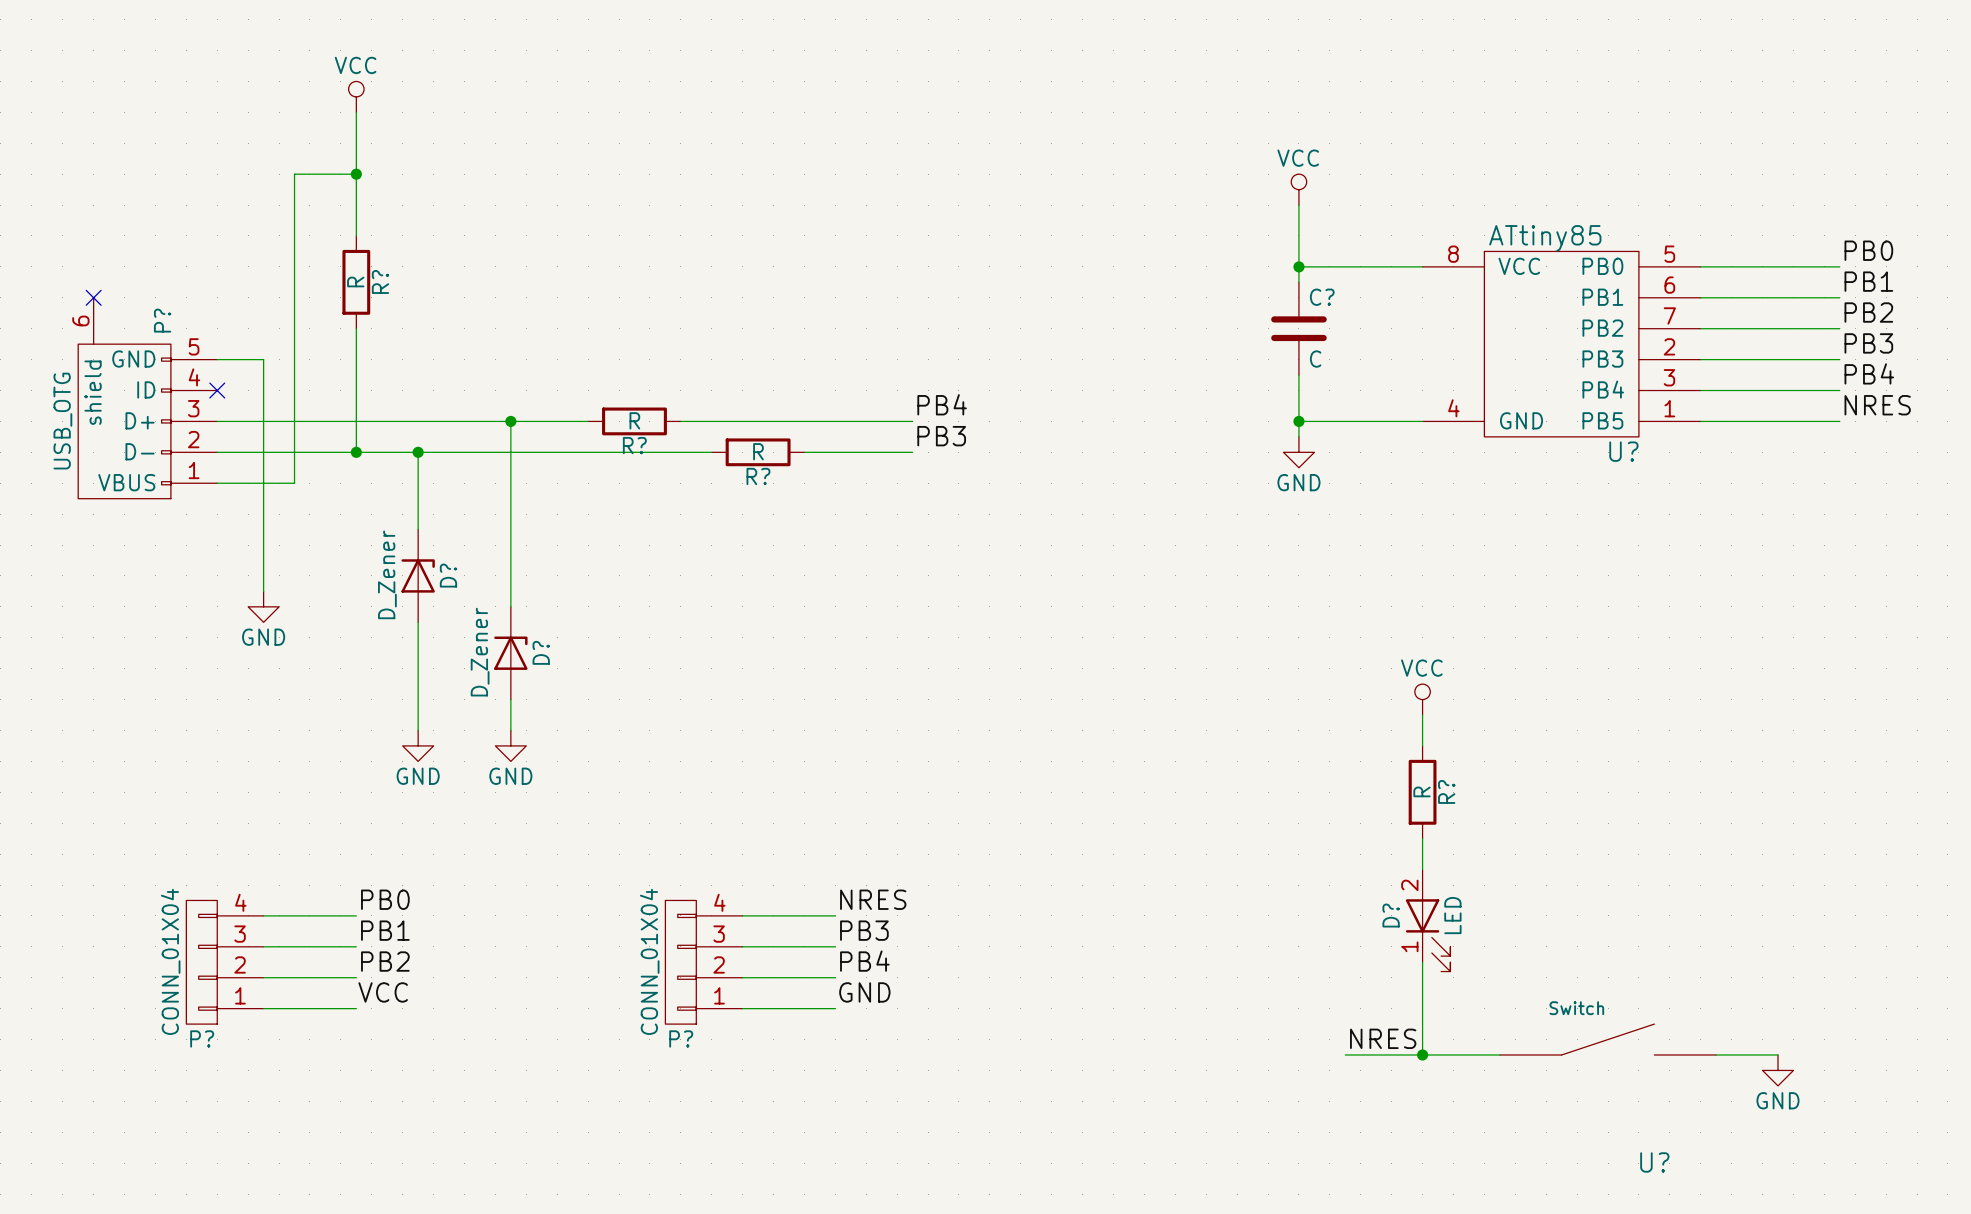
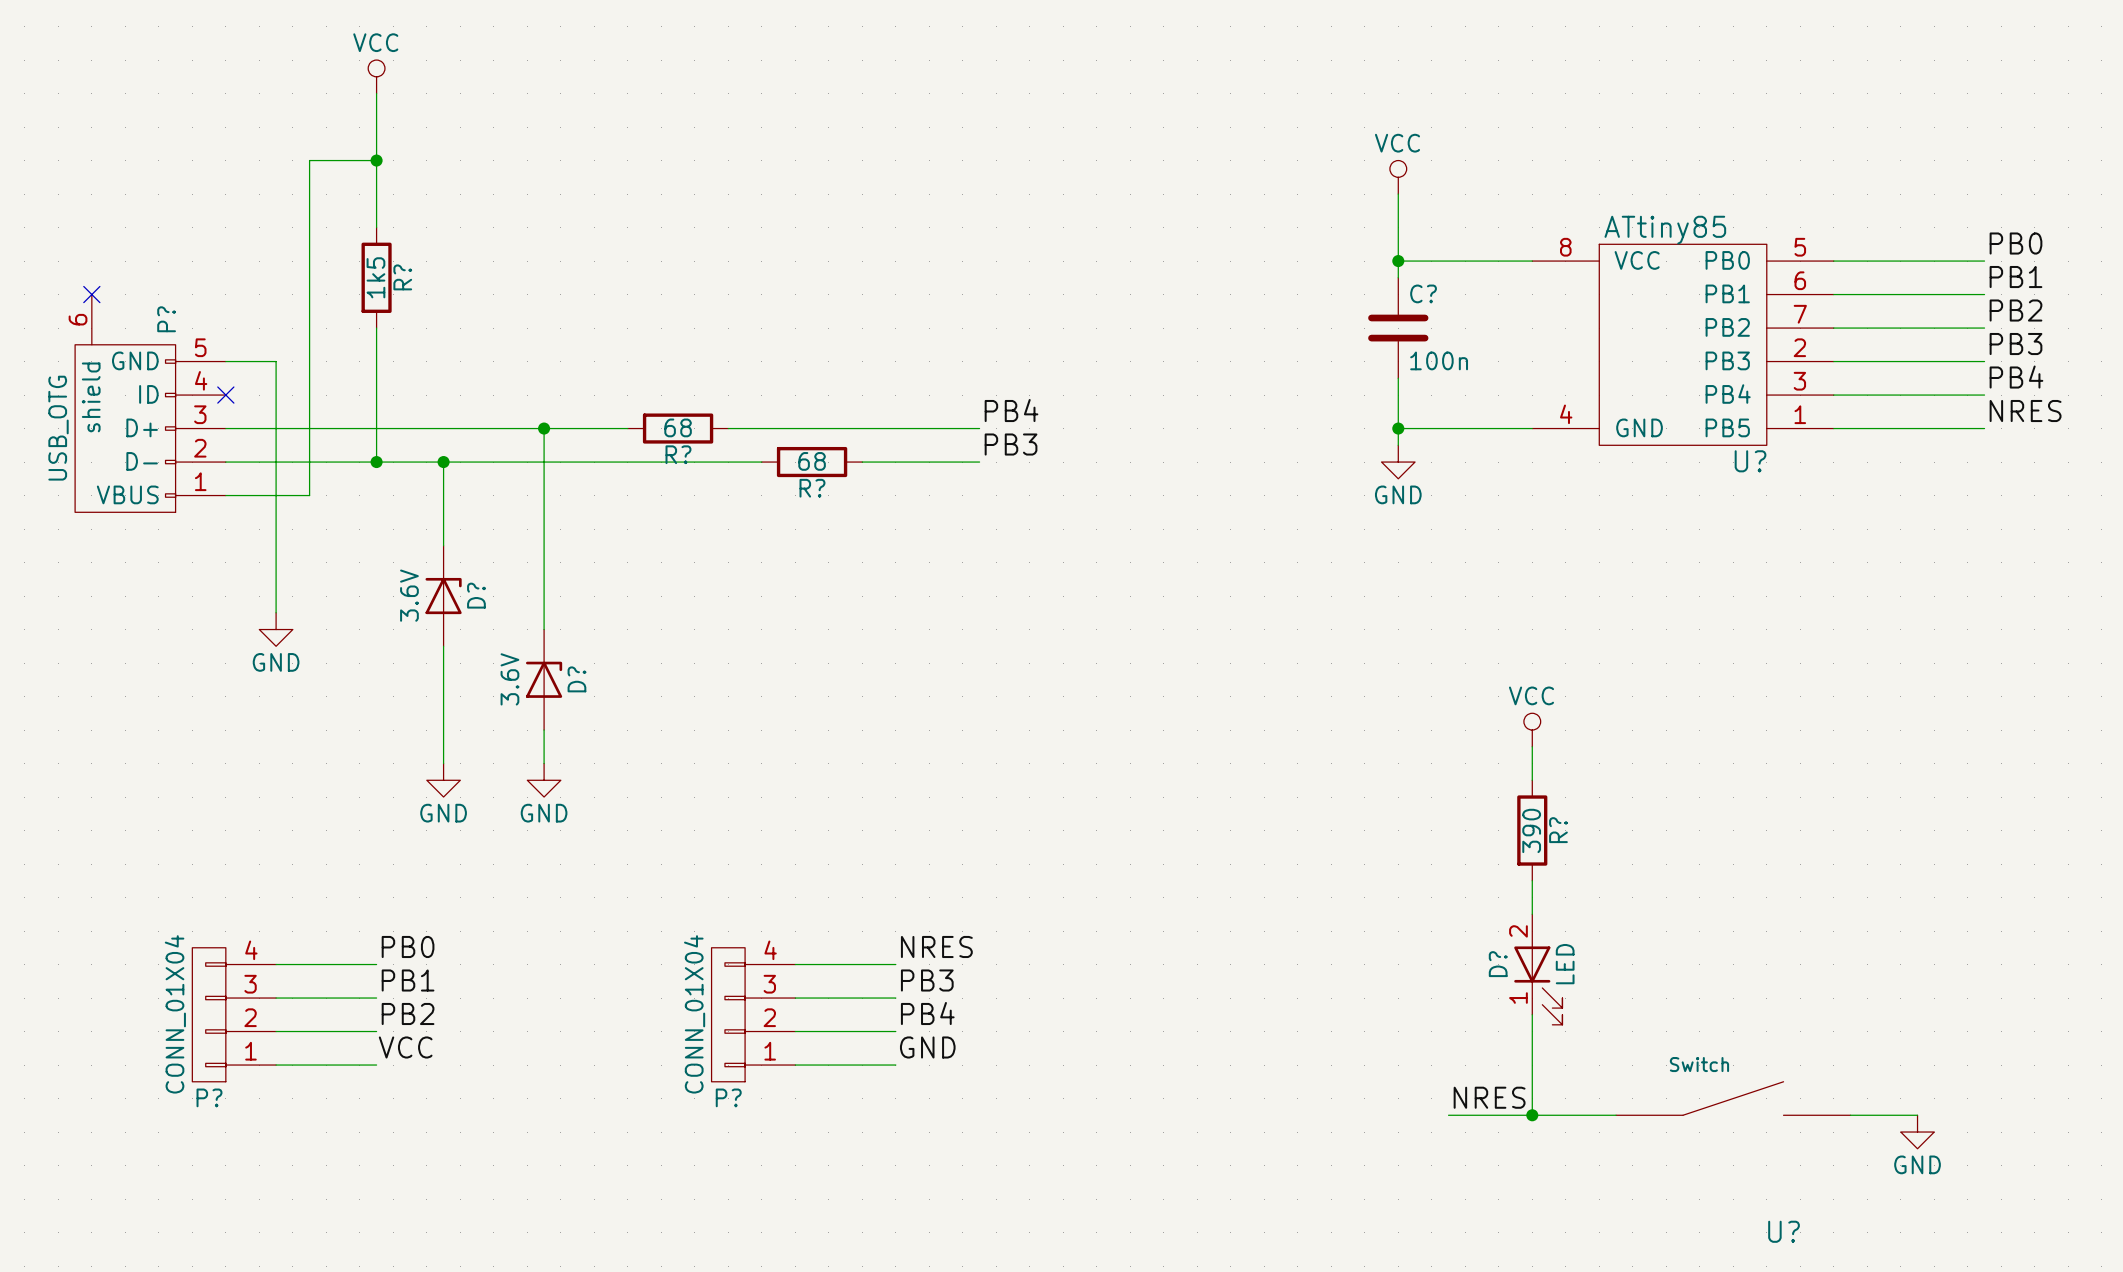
R? value: R (355, 281) -> 1k5 (375, 277)
C? value: C (1315, 359) -> 100n (1439, 360)
R? value: R (634, 420) -> 68 (678, 427)
R? value: R (758, 451) -> 68 (812, 461)
D? value: D_Zener (387, 574) -> 3.6V (409, 595)
D? value: D_Zener (480, 652) -> 3.6V (509, 679)
R? value: R (1422, 791) -> 390 (1531, 830)

